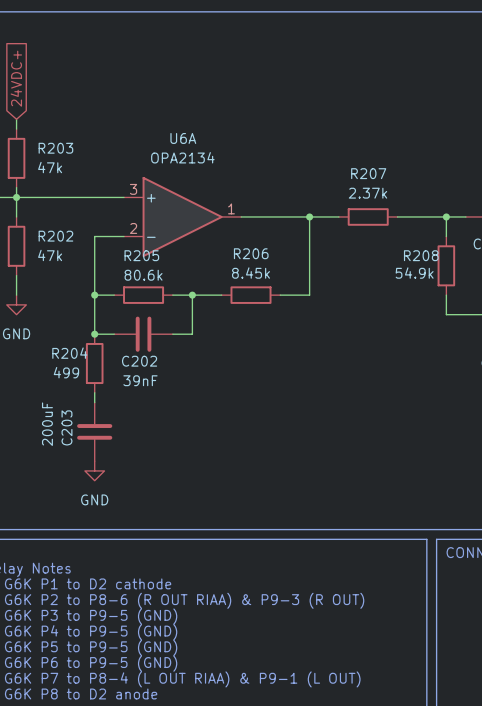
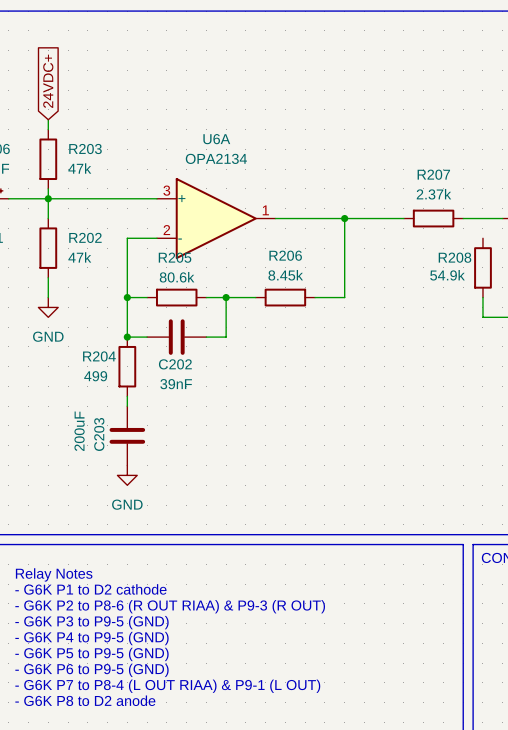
R207 position: (368, 216) -> (433, 218)
wire: (397, 216) (426, 216) -> (374, 218) (403, 218)
wire: (446, 216) (446, 236) -> none
junction: (446, 216) -> none

